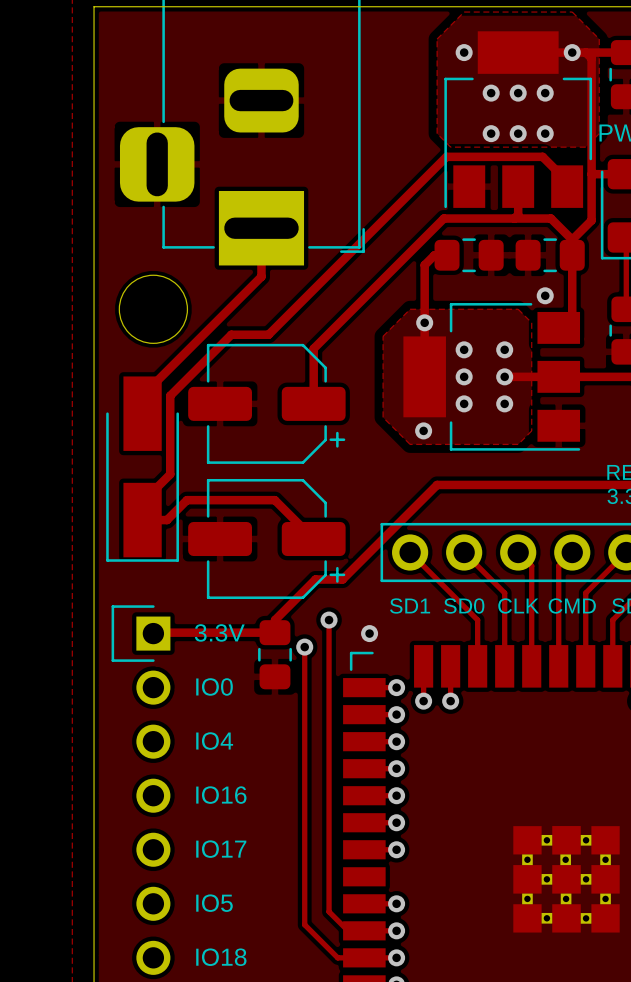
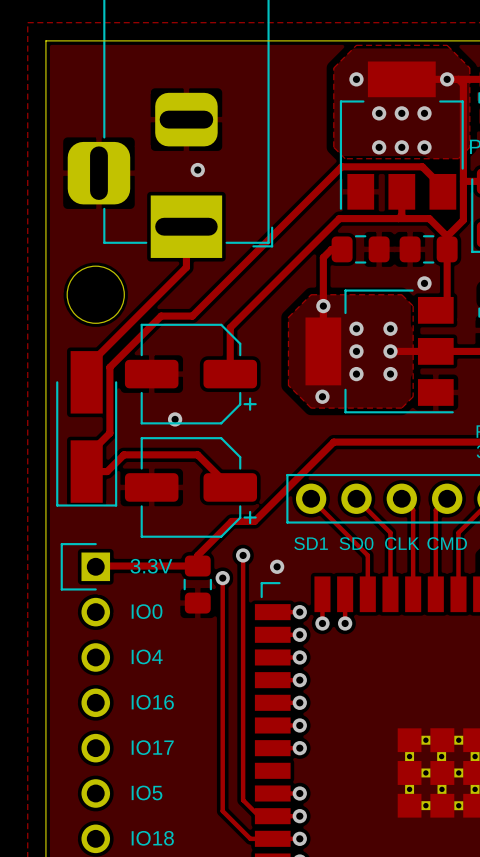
via: none -> (197, 170)
via: none -> (175, 419)

